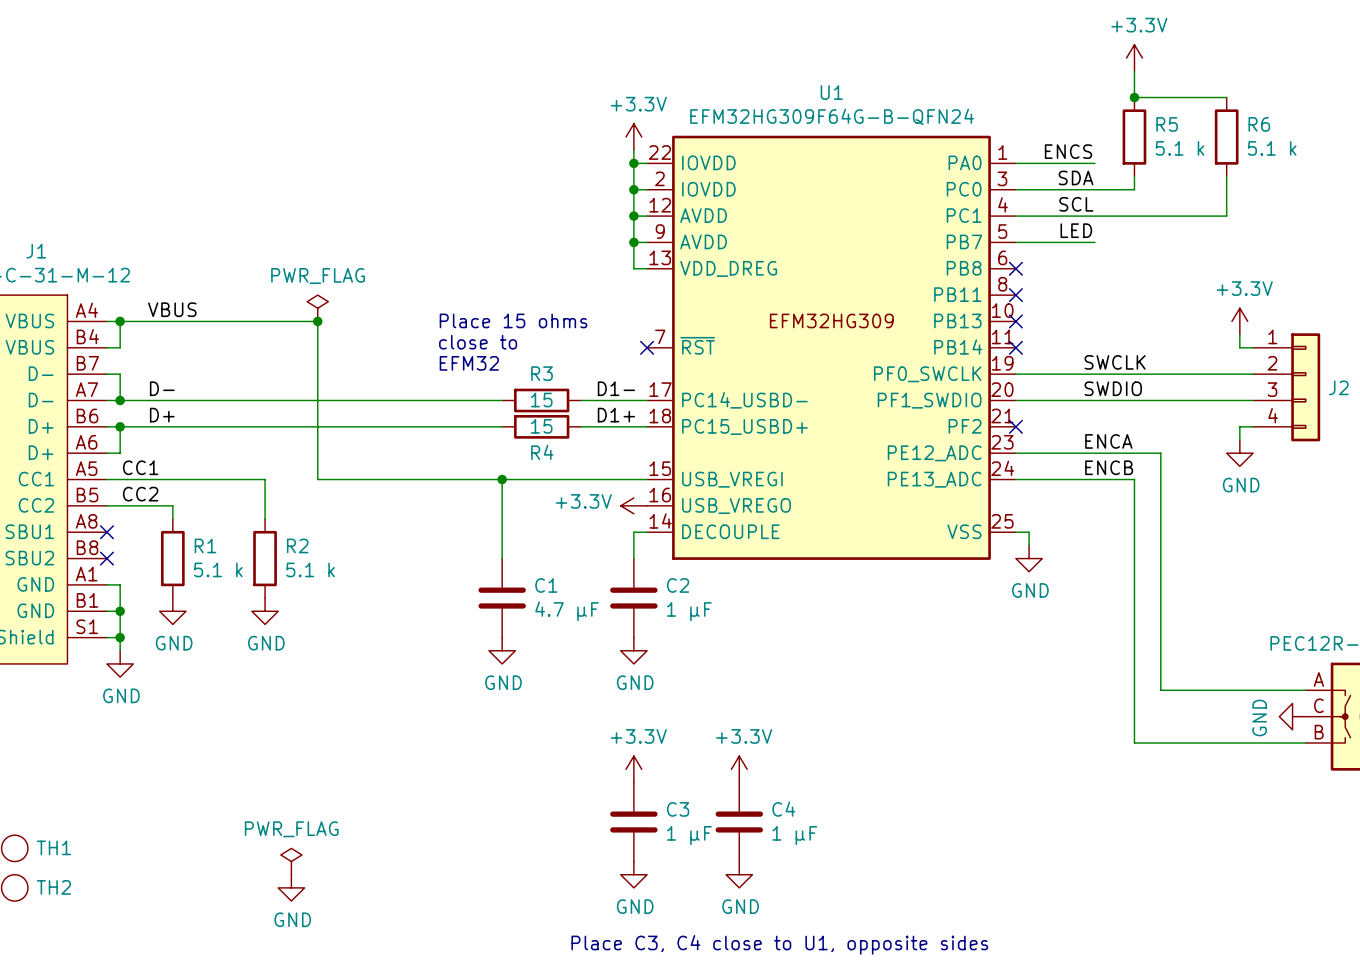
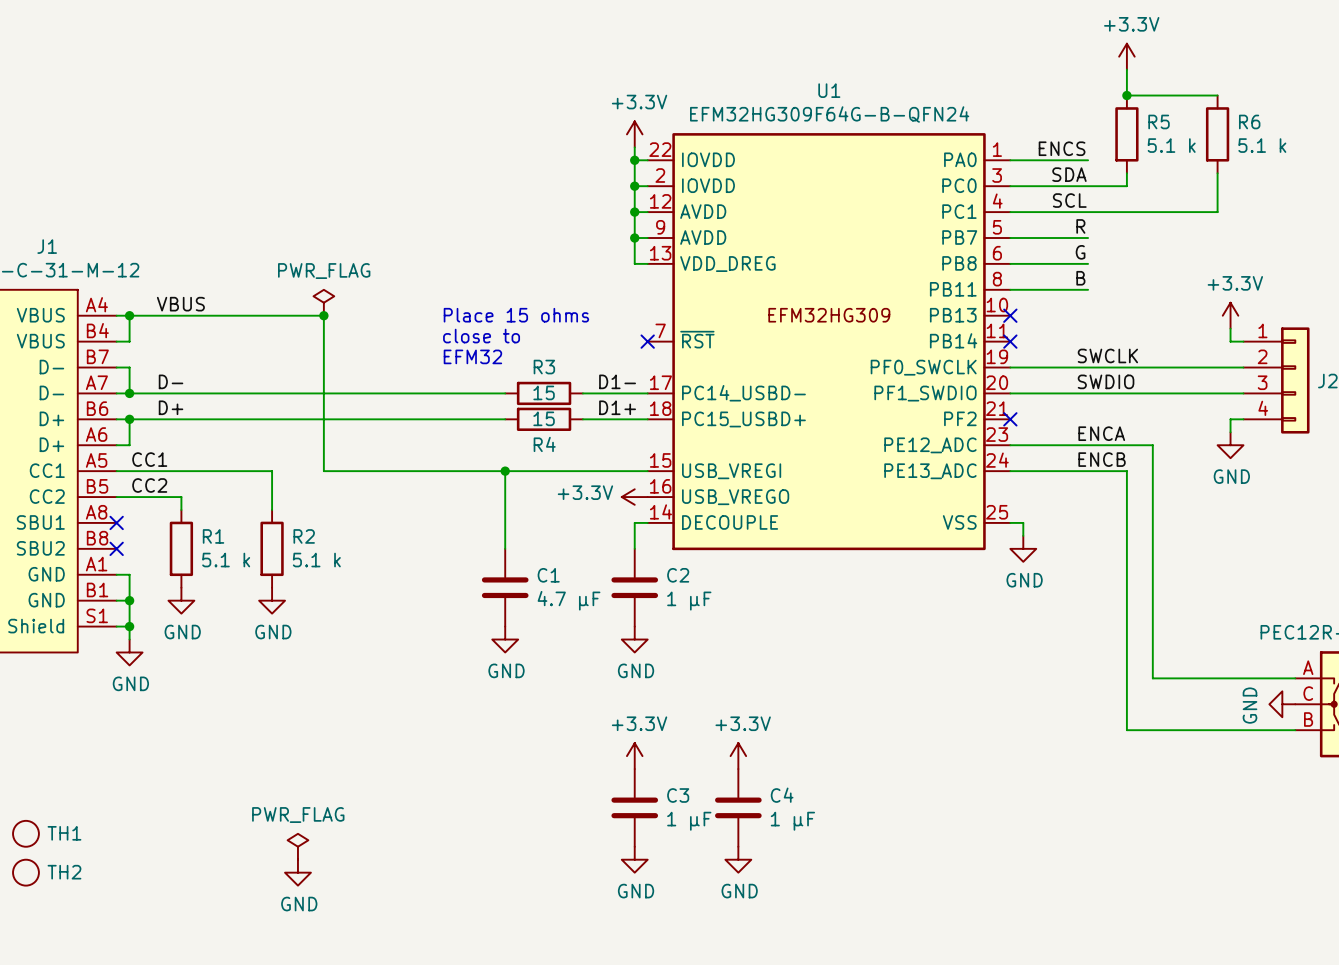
label: LED (1076, 230) -> R (1080, 226)
label: none -> G (1080, 252)
wire: none -> (1010, 263) (1088, 263)
no-connect mark: (1015, 268) -> none
label: none -> B (1080, 278)
wire: none -> (1010, 289) (1088, 289)
no-connect mark: (1015, 295) -> none
text: Place C3, C4 close to U1, opposite sides (779, 944) -> none

